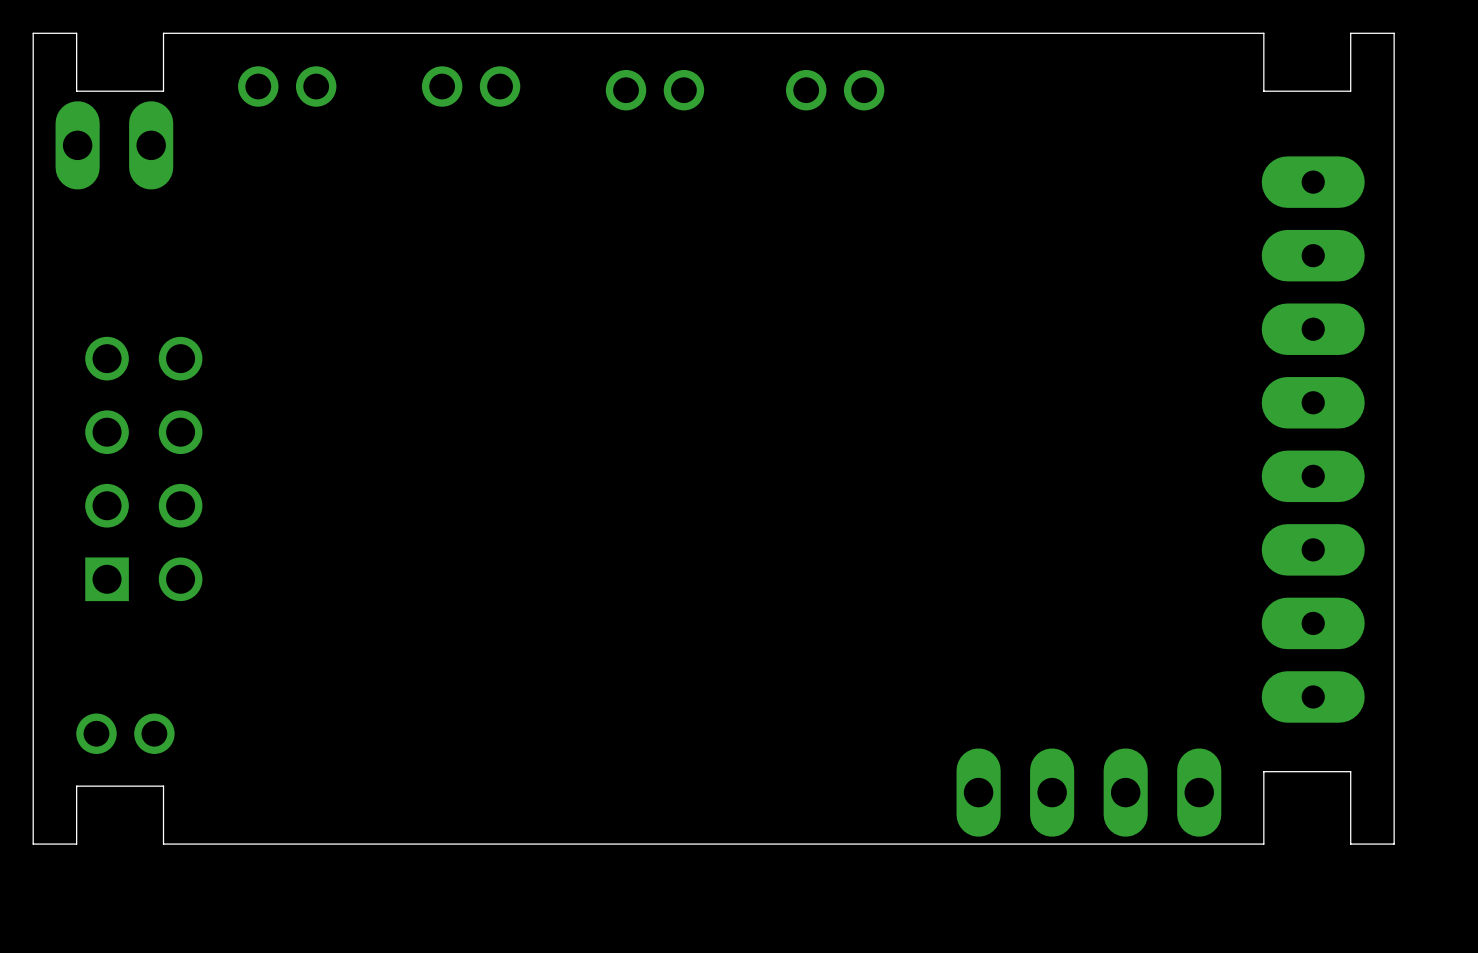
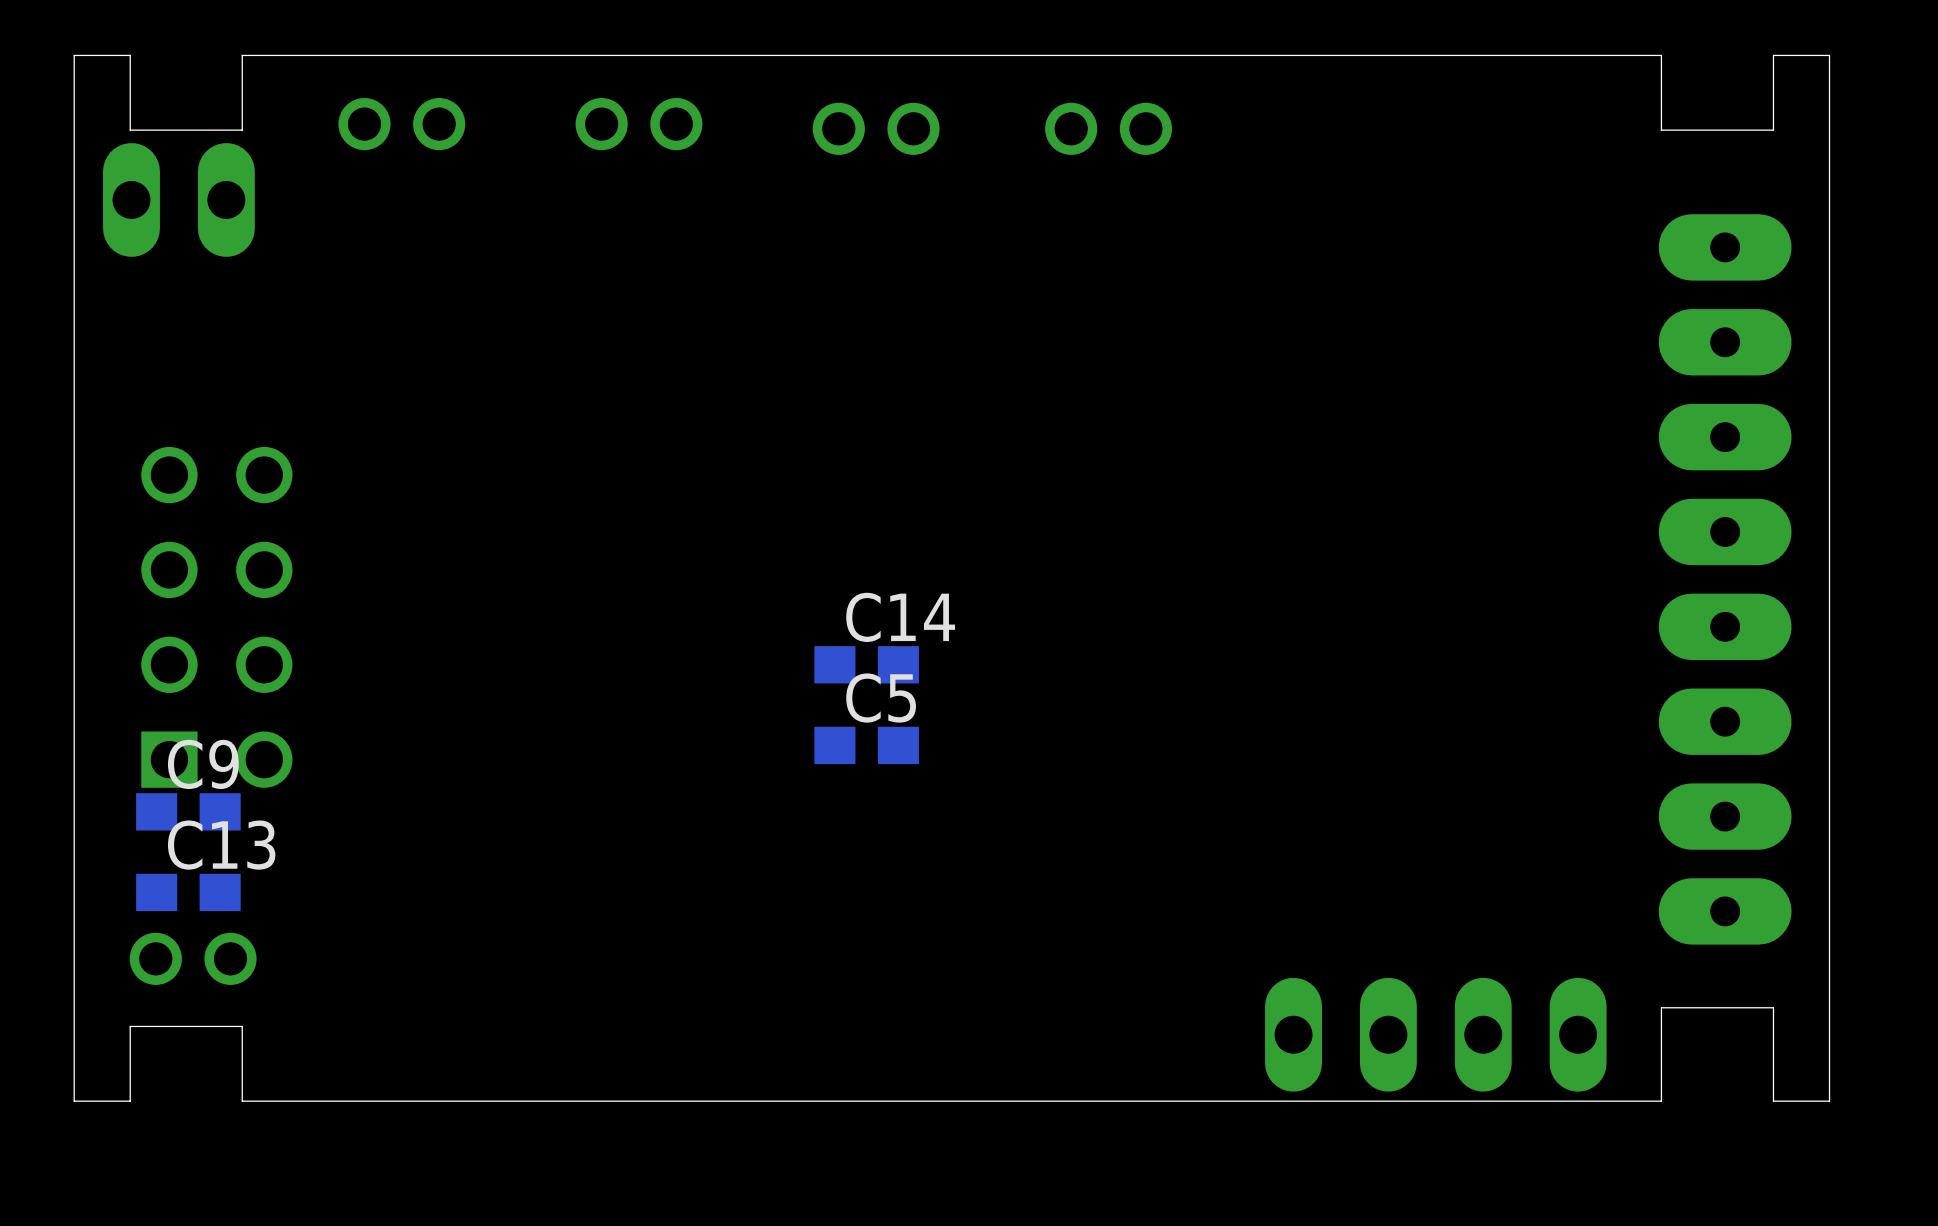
C14: none -> (866, 664)
C5: none -> (866, 745)
C9: none -> (188, 811)
C13: none -> (188, 892)

